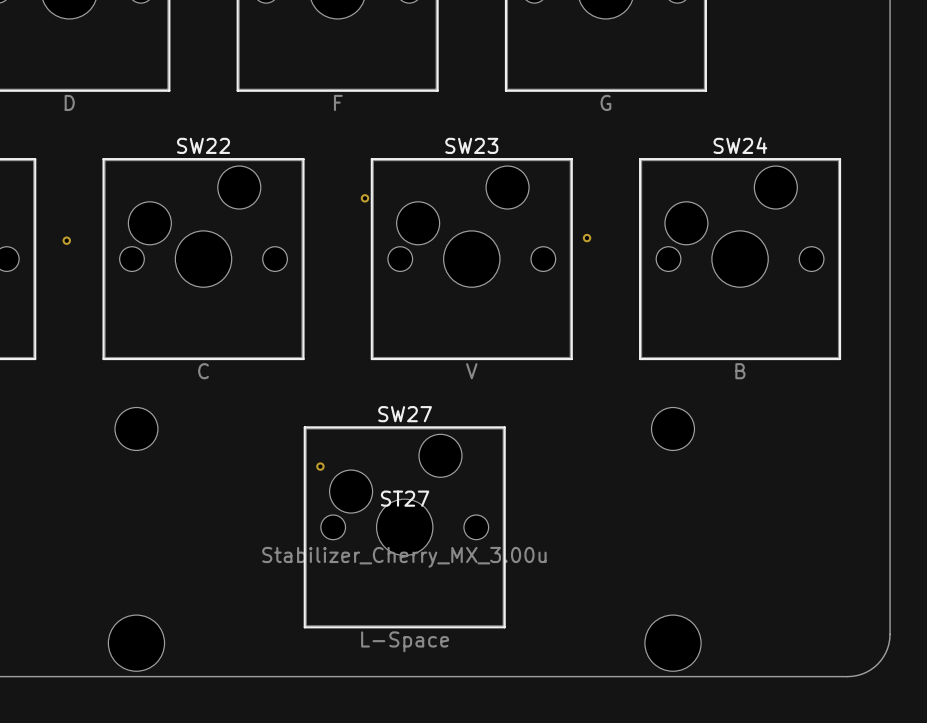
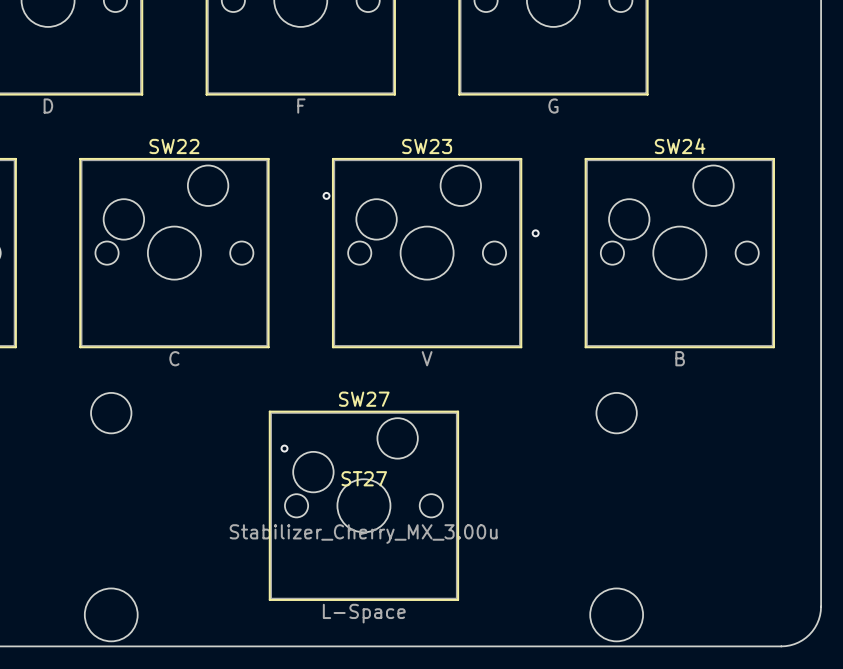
via: (66, 240) -> none

